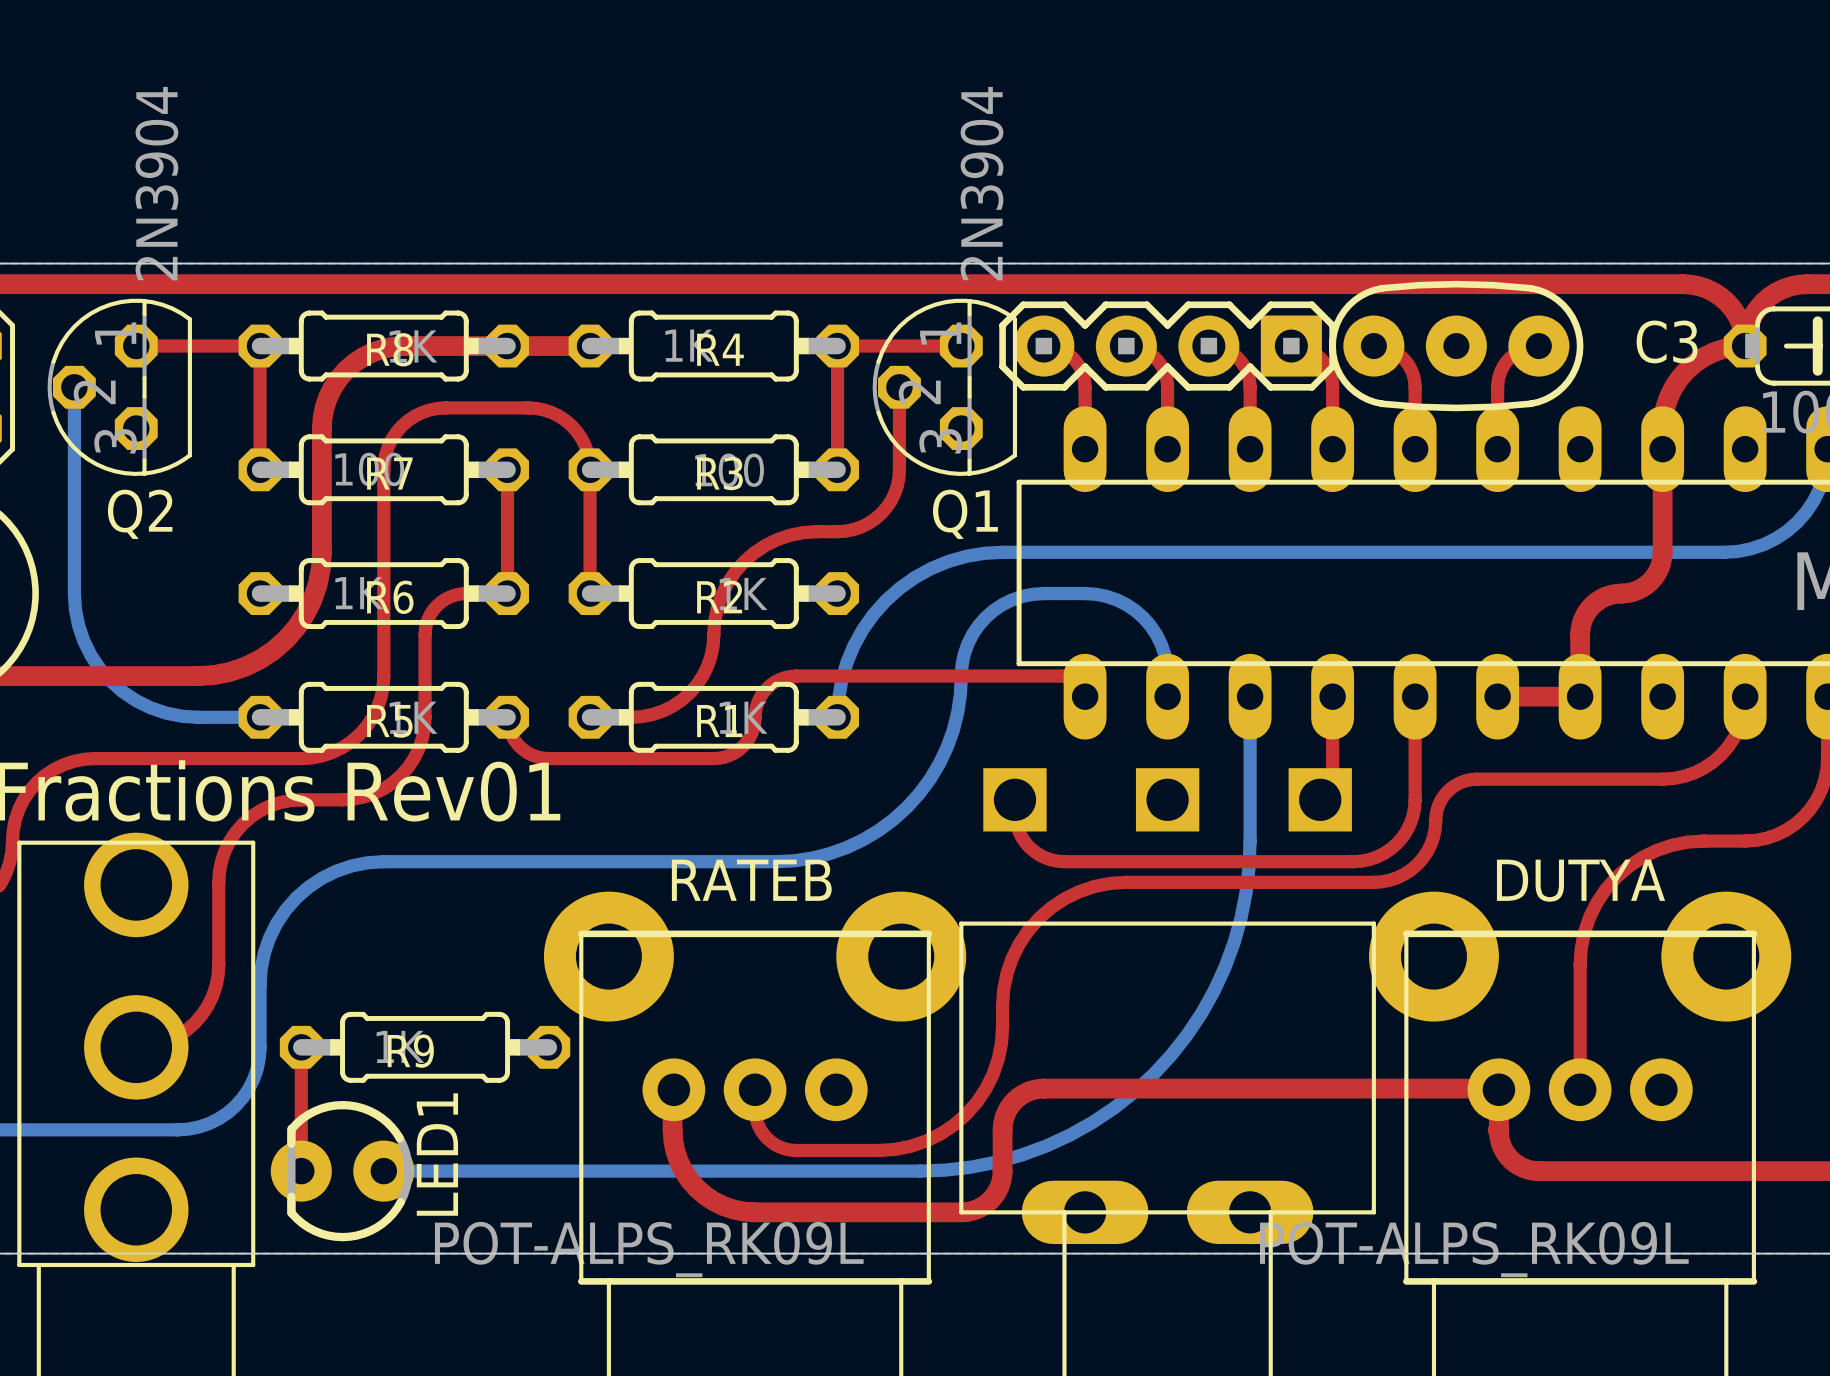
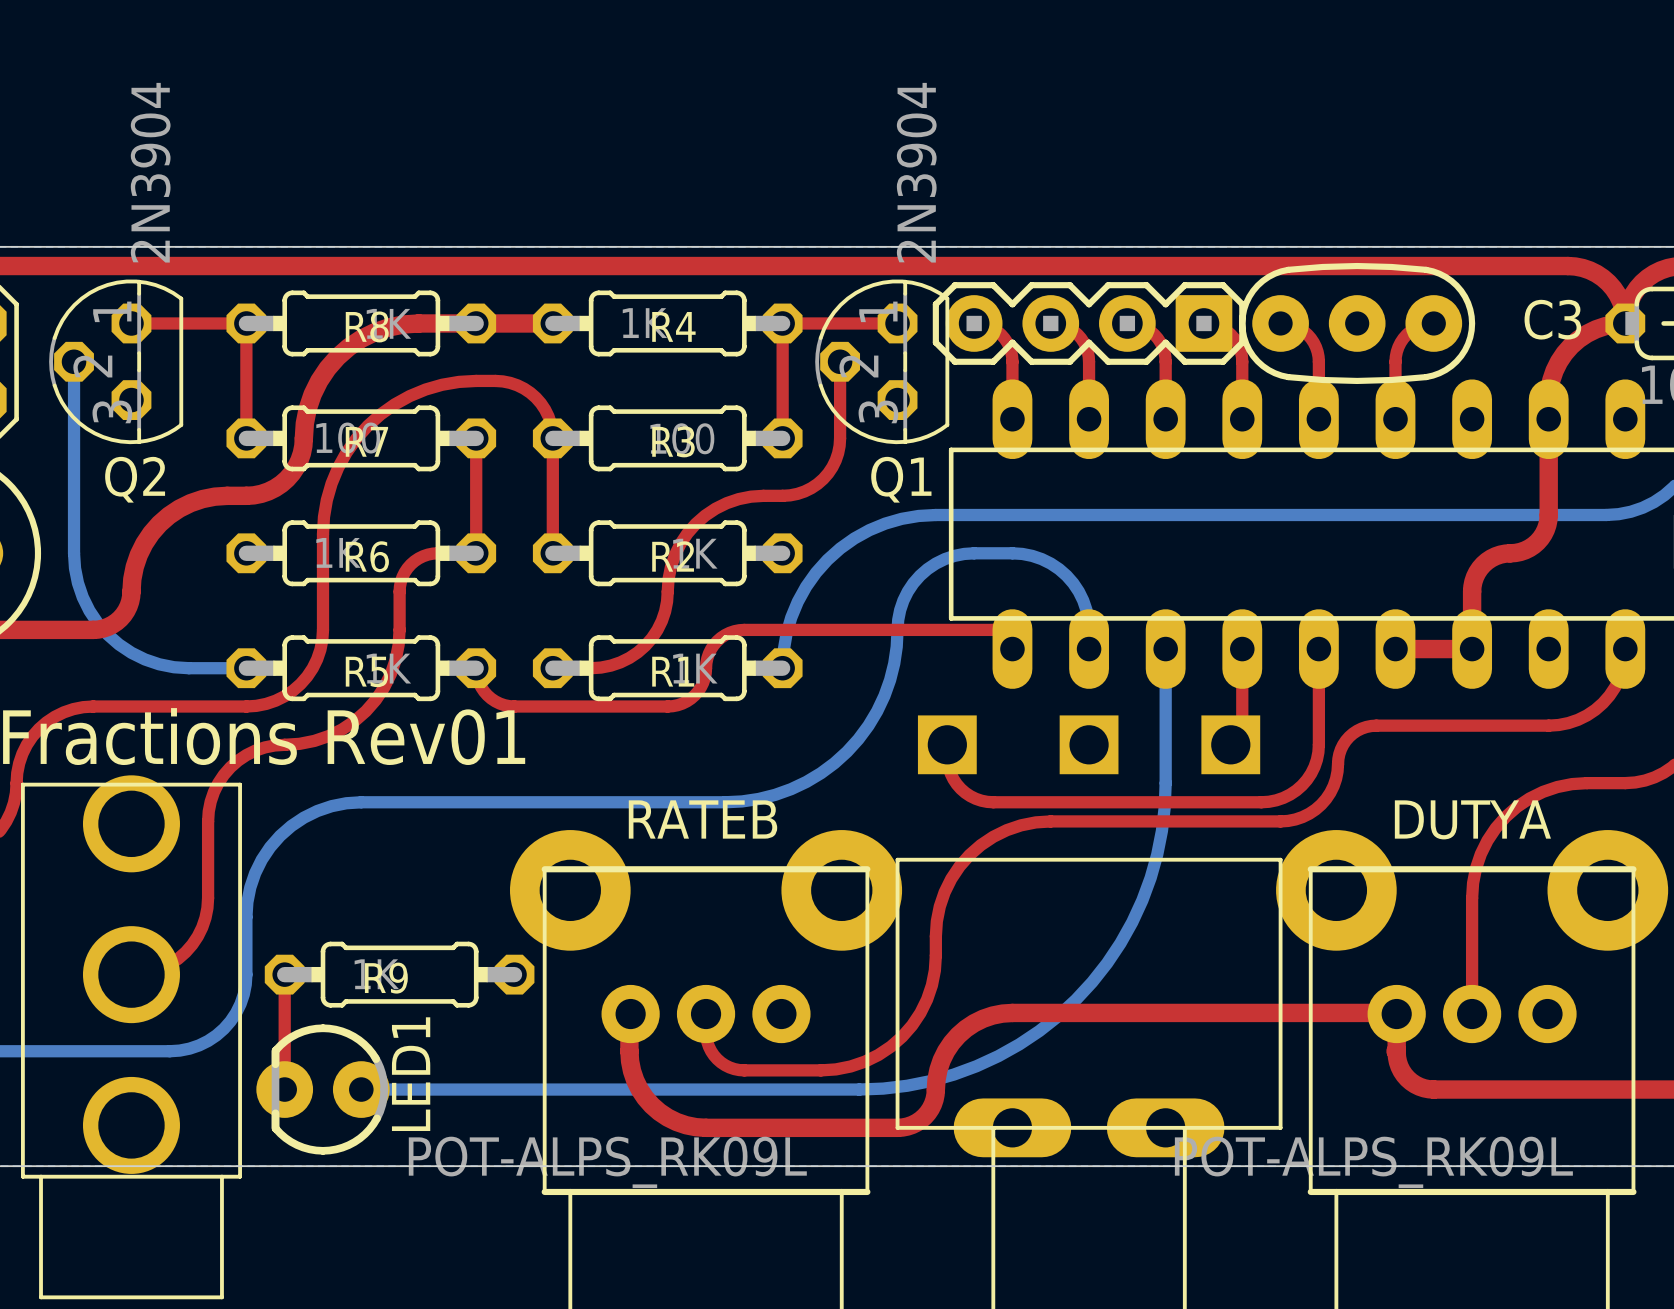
top track: (445, 346) (393, 346) (372, 352) (346, 370) (332, 387) (322, 417) (320, 568) (312, 599) (305, 614) (285, 639) (260, 659) (245, 666) (214, 675) (95, 676) -> (418, 323) (389, 327) (374, 332) (348, 347) (327, 368) (312, 394) (307, 408) (303, 445) (299, 460) (291, 473) (281, 483) (268, 491) (253, 495) (214, 496) (202, 499) (179, 508) (159, 523) (144, 543) (138, 554) (132, 579) (130, 601) (126, 610) (112, 624) (93, 629)
top track: (507, 407) (445, 407) (429, 410) (408, 420) (396, 432) (388, 446) (384, 461) (383, 676) (377, 707) (359, 734) (332, 752) (312, 757) (260, 758) -> (476, 380) (442, 384) (425, 389) (394, 404) (367, 425) (346, 452) (331, 483) (323, 516) (323, 629) (317, 659) (307, 676) (284, 696) (266, 703) (246, 706)
top track: (425, 676) (425, 717) (422, 738) (413, 758) (400, 775) (383, 788) (363, 797) (342, 799) (301, 799) -> (399, 629) (395, 659) (390, 673) (375, 699) (365, 711) (354, 721) (328, 736) (299, 743) (284, 744)
top track: (1085, 1088) (1038, 1088) (1023, 1094) (1014, 1100) (1008, 1109) (1002, 1124) (1002, 1171) -> (1012, 1012) (983, 1018) (958, 1035) (941, 1060) (935, 1089)

